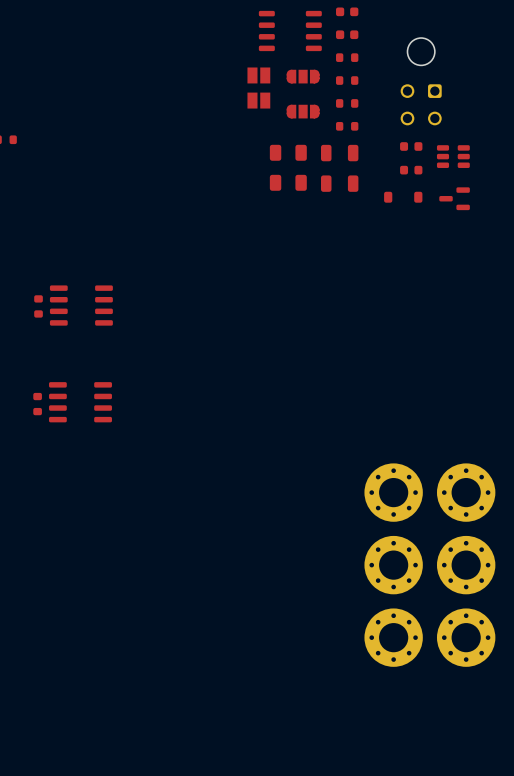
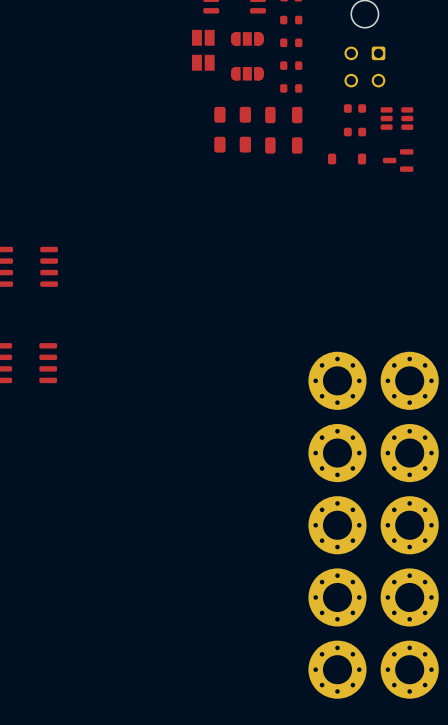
part: none -> (337, 380)
part: none -> (409, 380)
part: none -> (337, 669)
part: none -> (409, 669)

